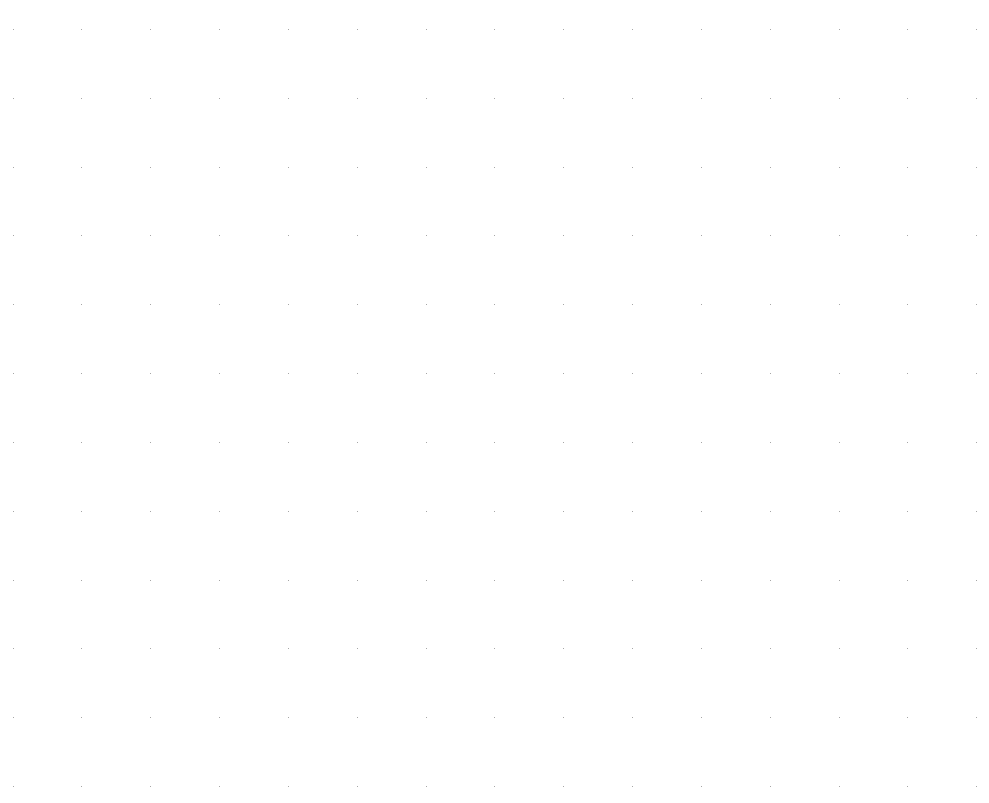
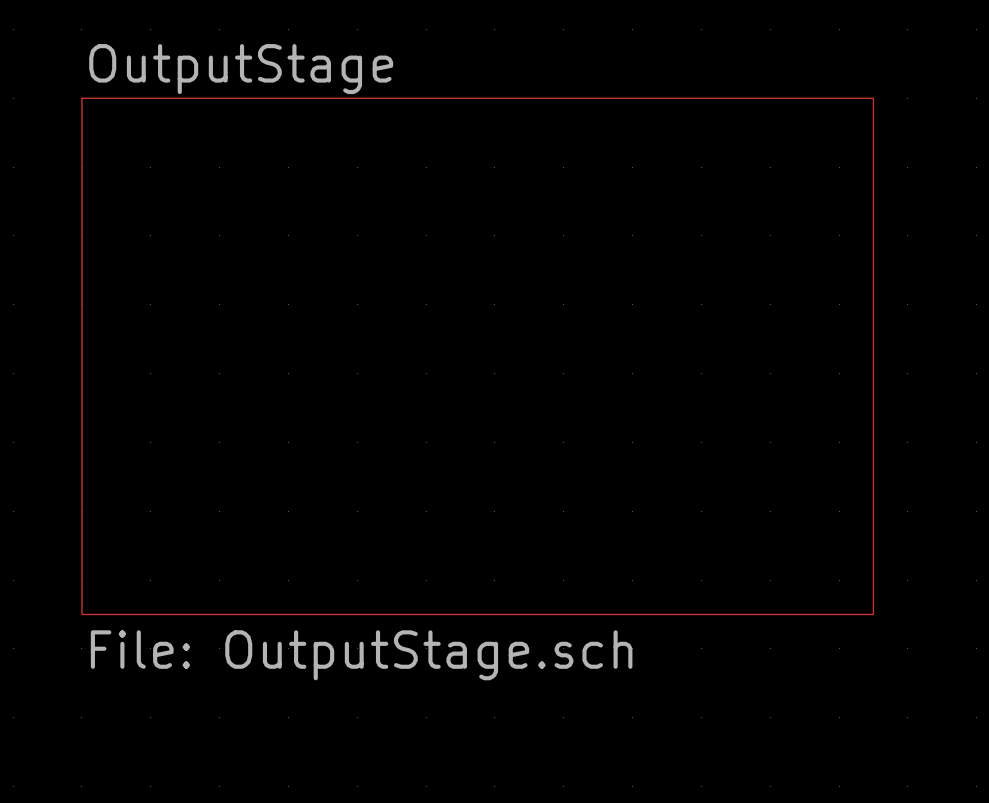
sheet OutputStage: none -> File: OutputStage.sch (477, 356)

